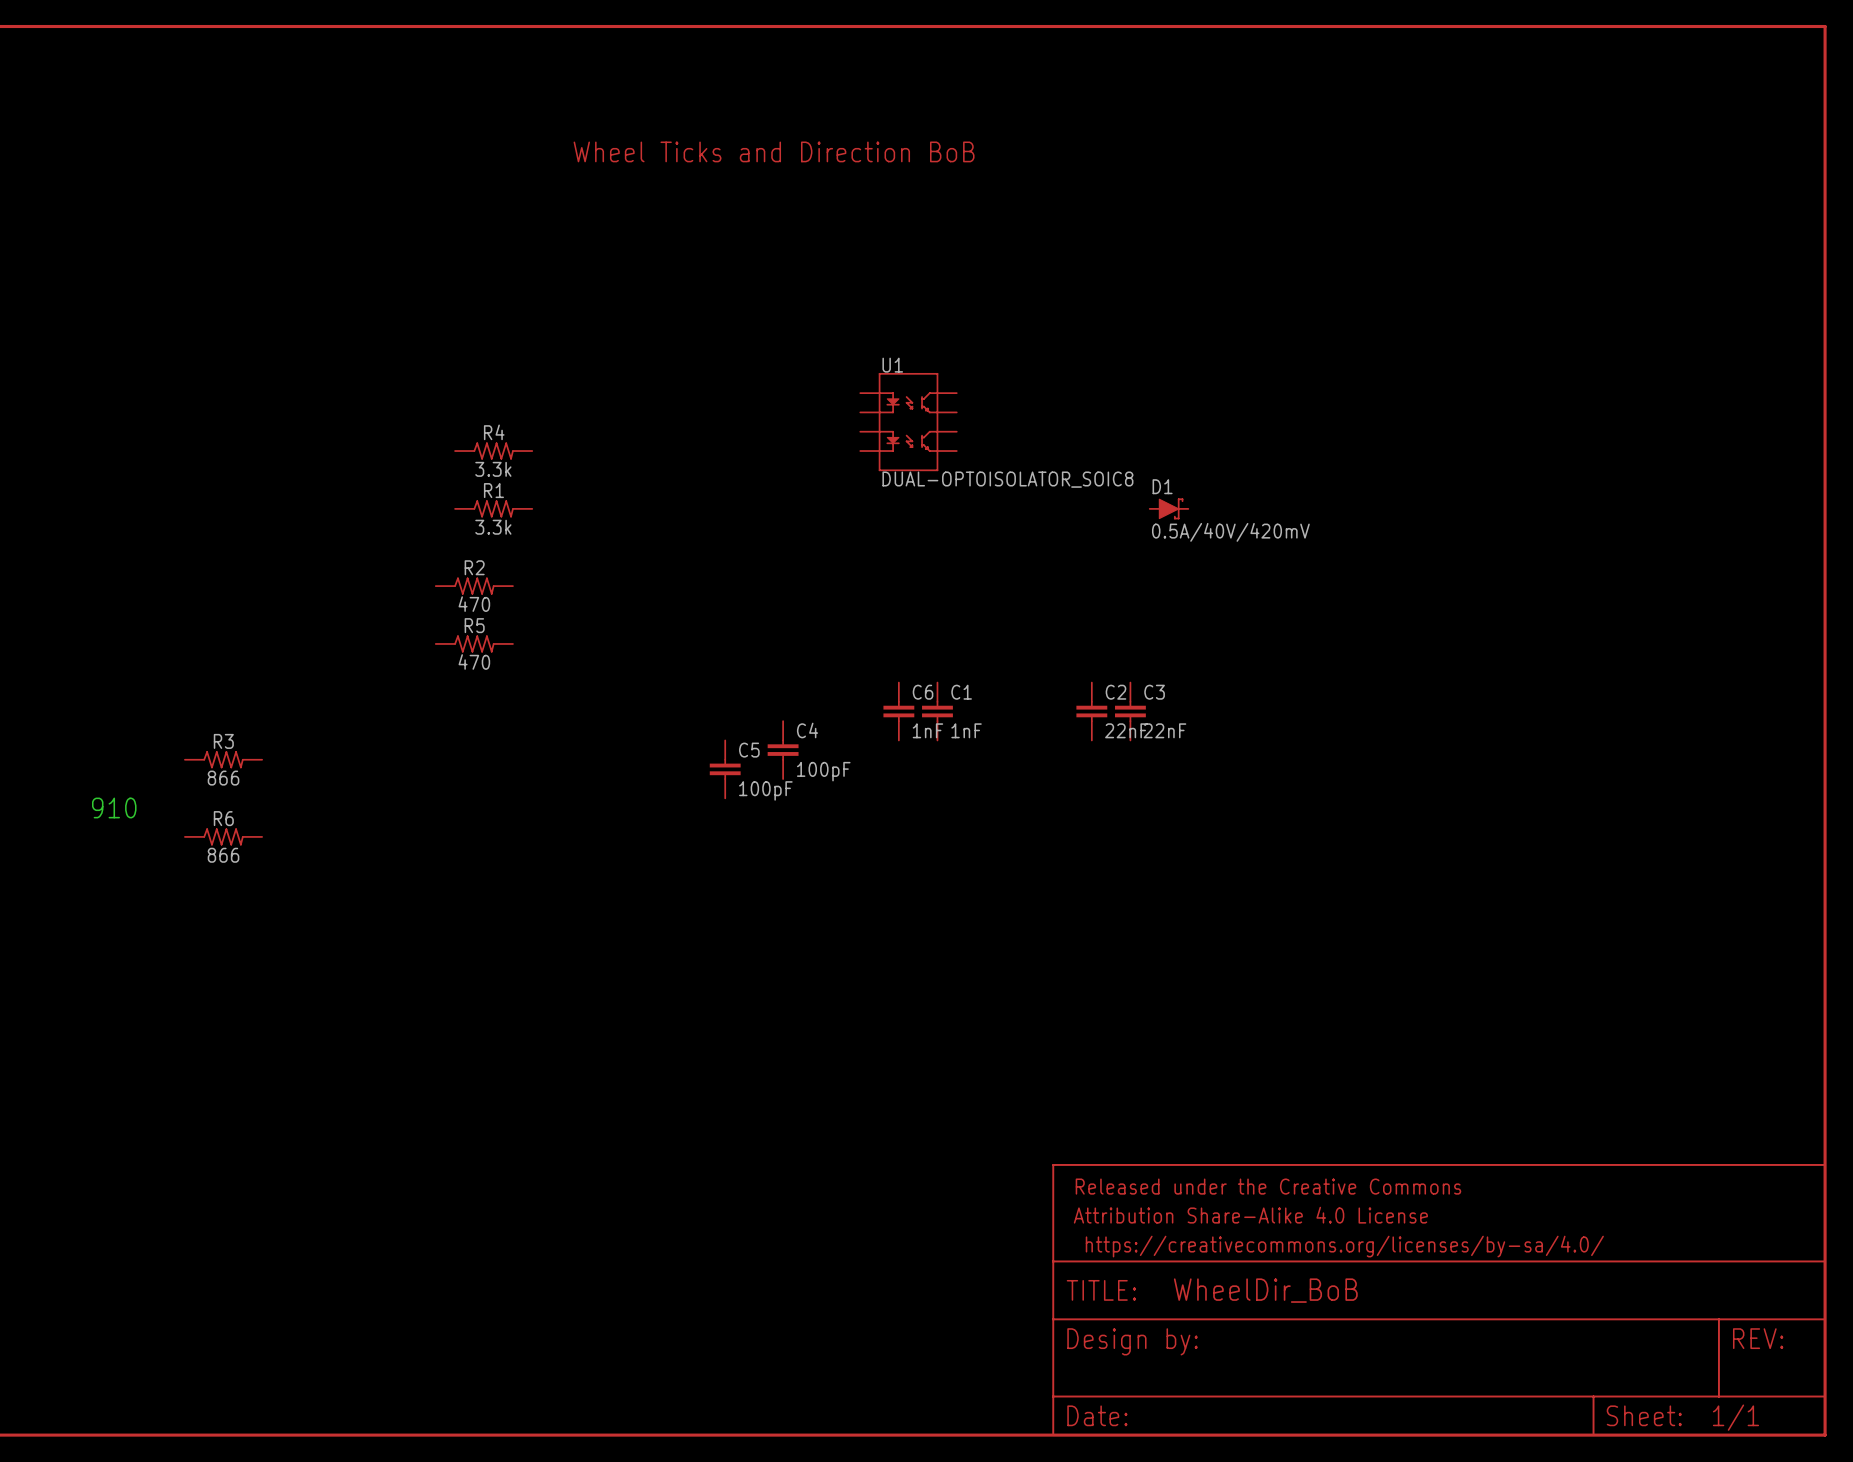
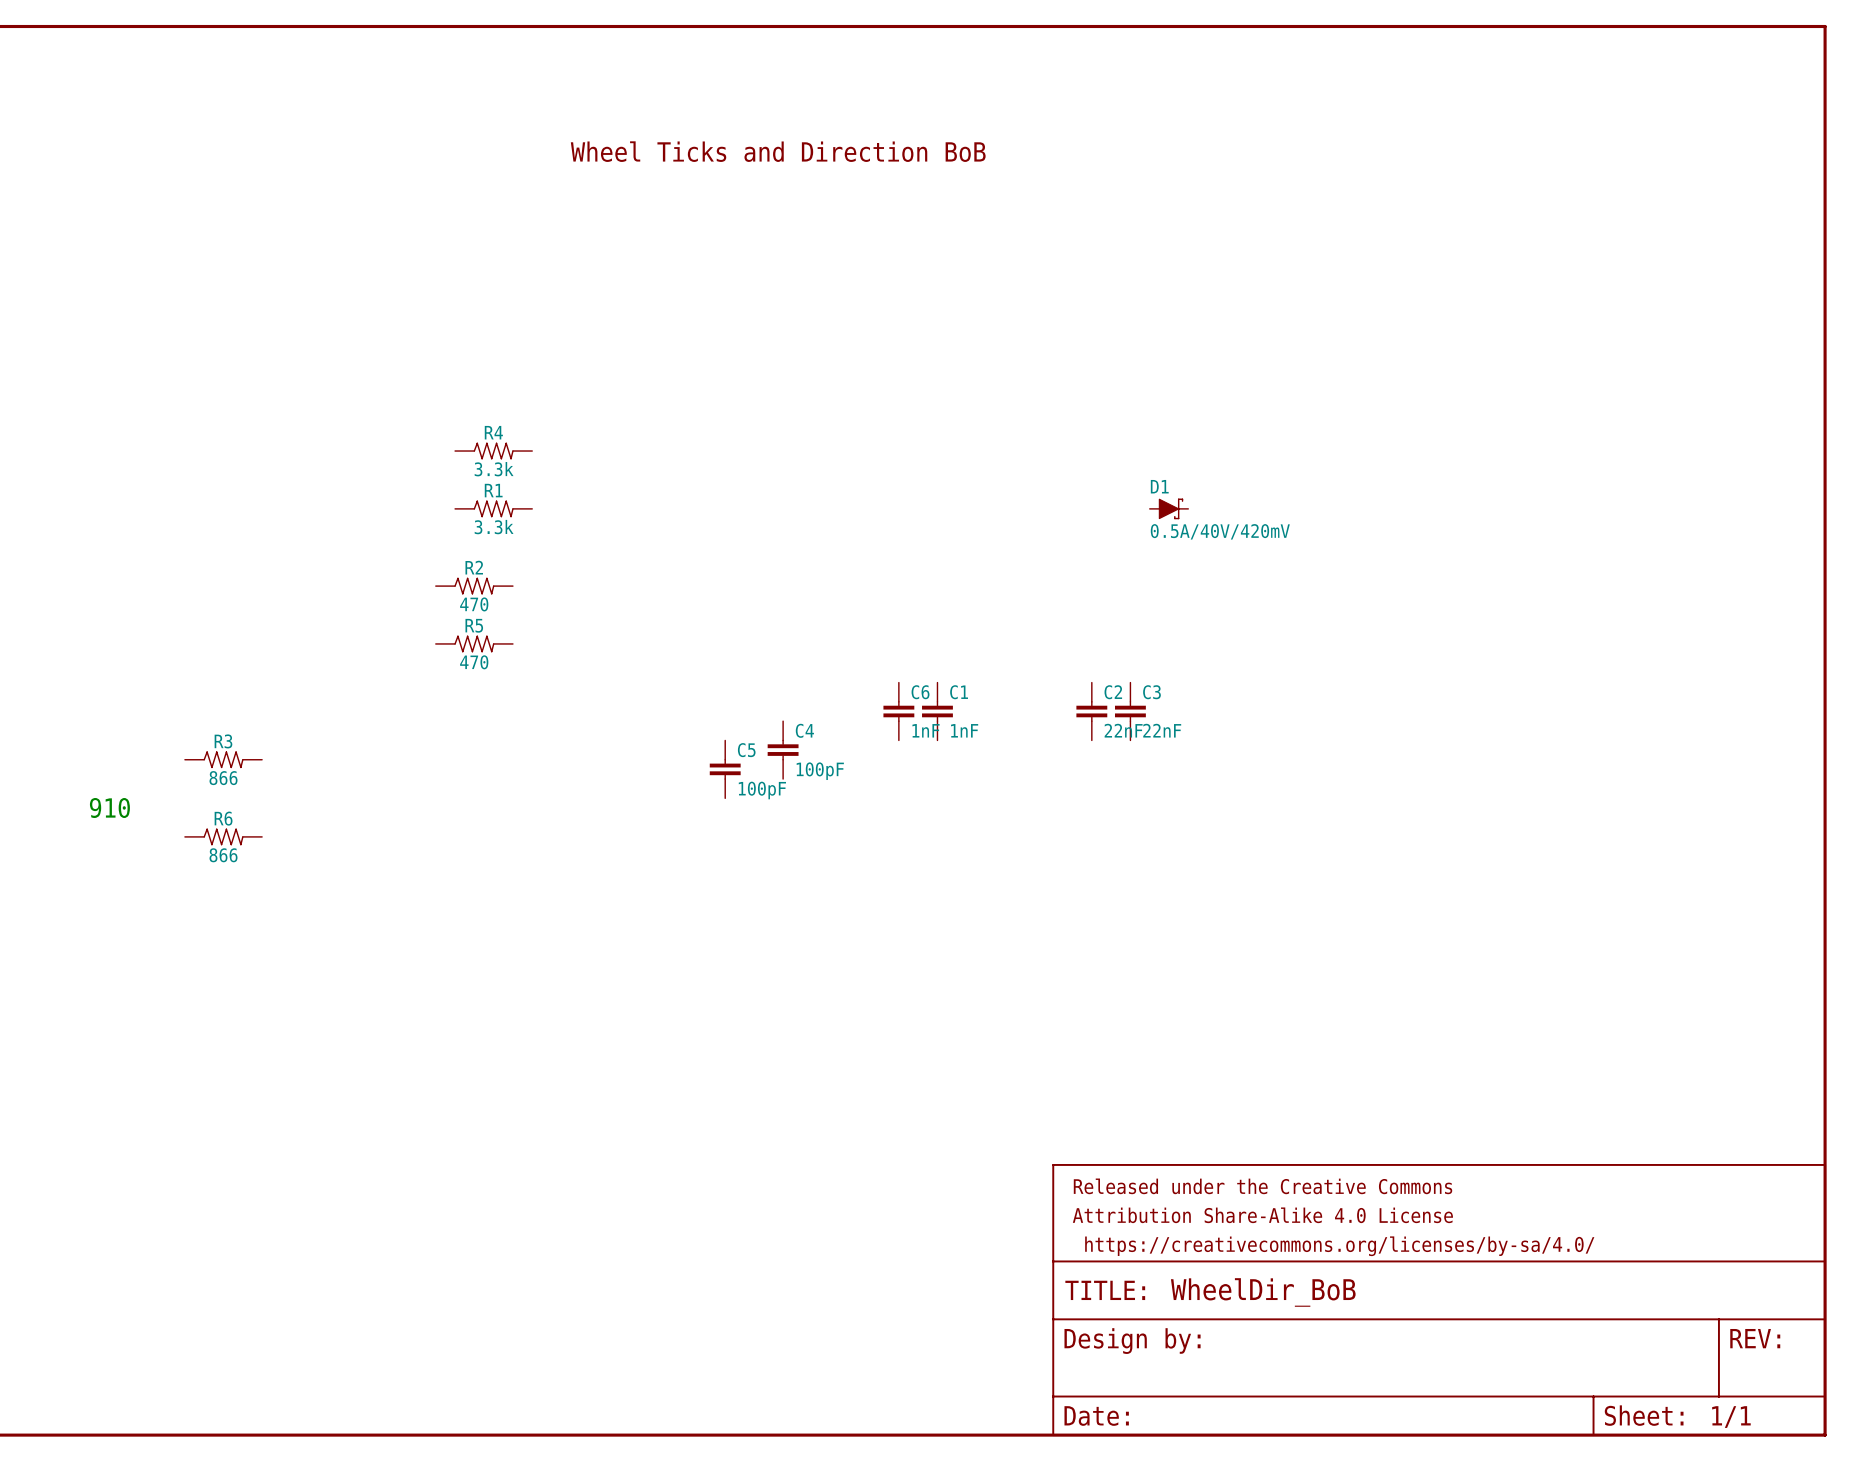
U1: DUAL-OPTOISOLATOR_SOIC8 (908, 422) -> none

